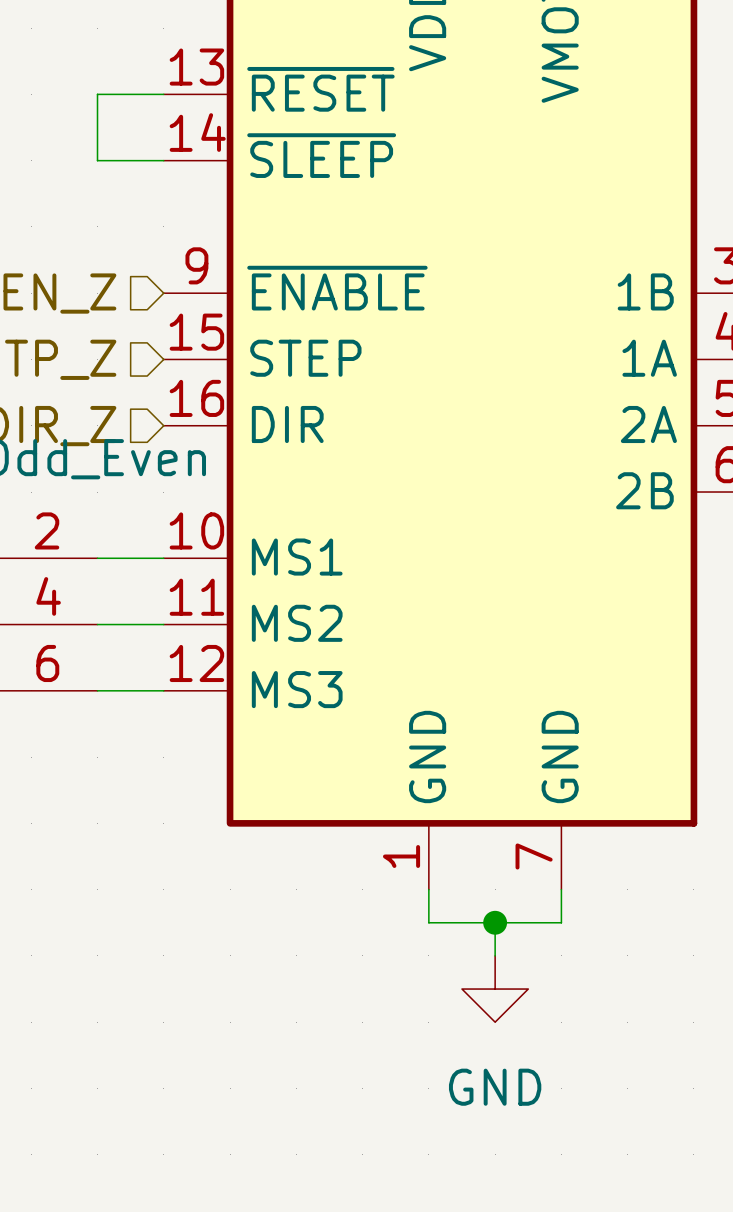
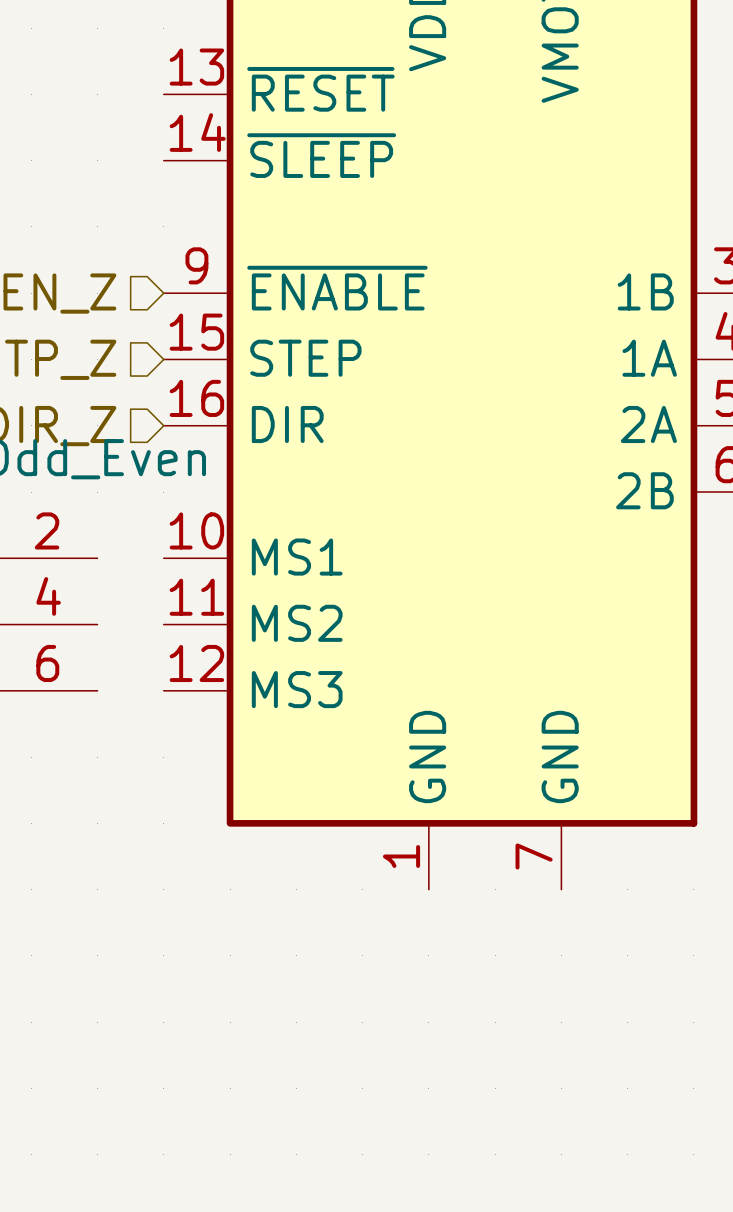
wire: (163, 94) (97, 94) (97, 160) (163, 160) -> none
wire: (97, 558) (163, 558) -> none
wire: (97, 624) (163, 624) -> none
wire: (97, 690) (163, 690) -> none
wire: (428, 889) (428, 922) (561, 922) (561, 889) -> none
wire: (495, 922) (495, 955) -> none
junction: (495, 922) -> none
power symbol: GND (495, 989) -> none

